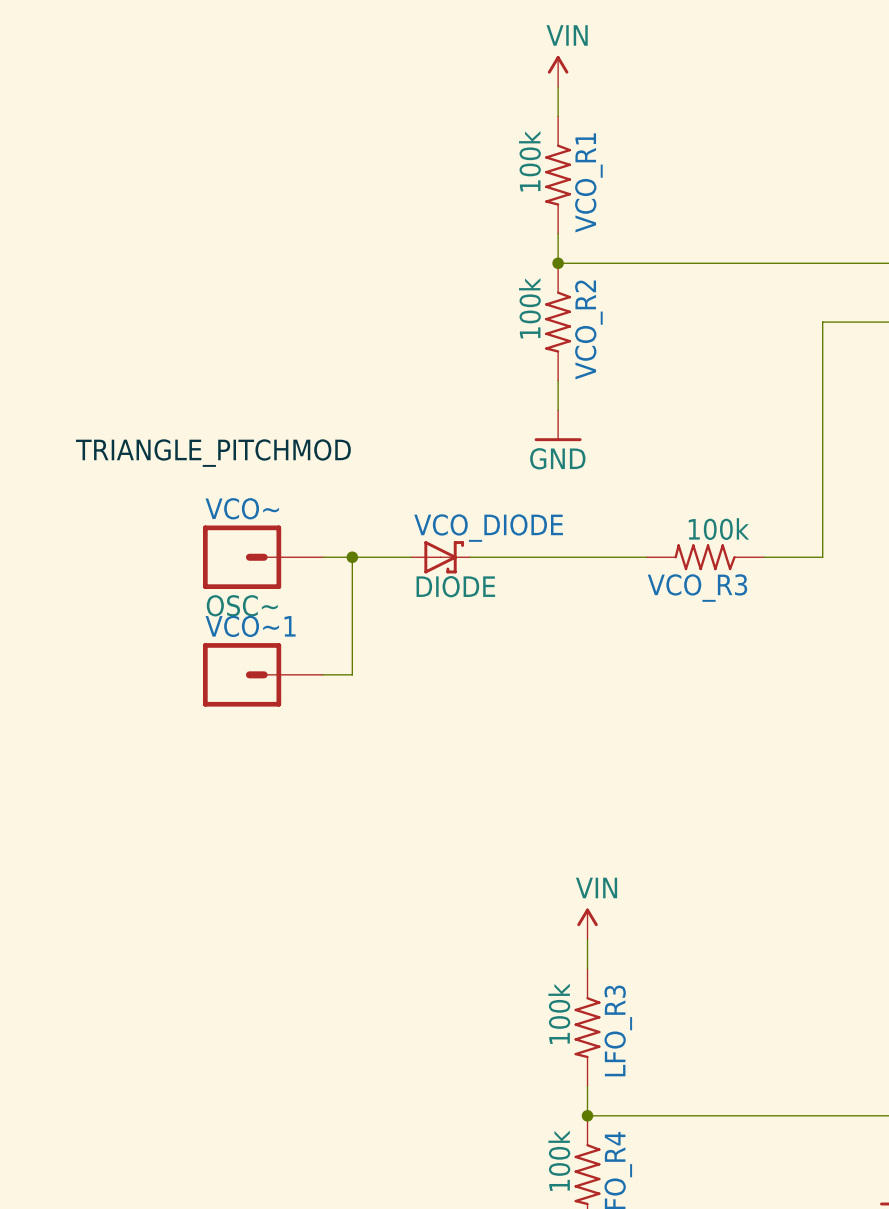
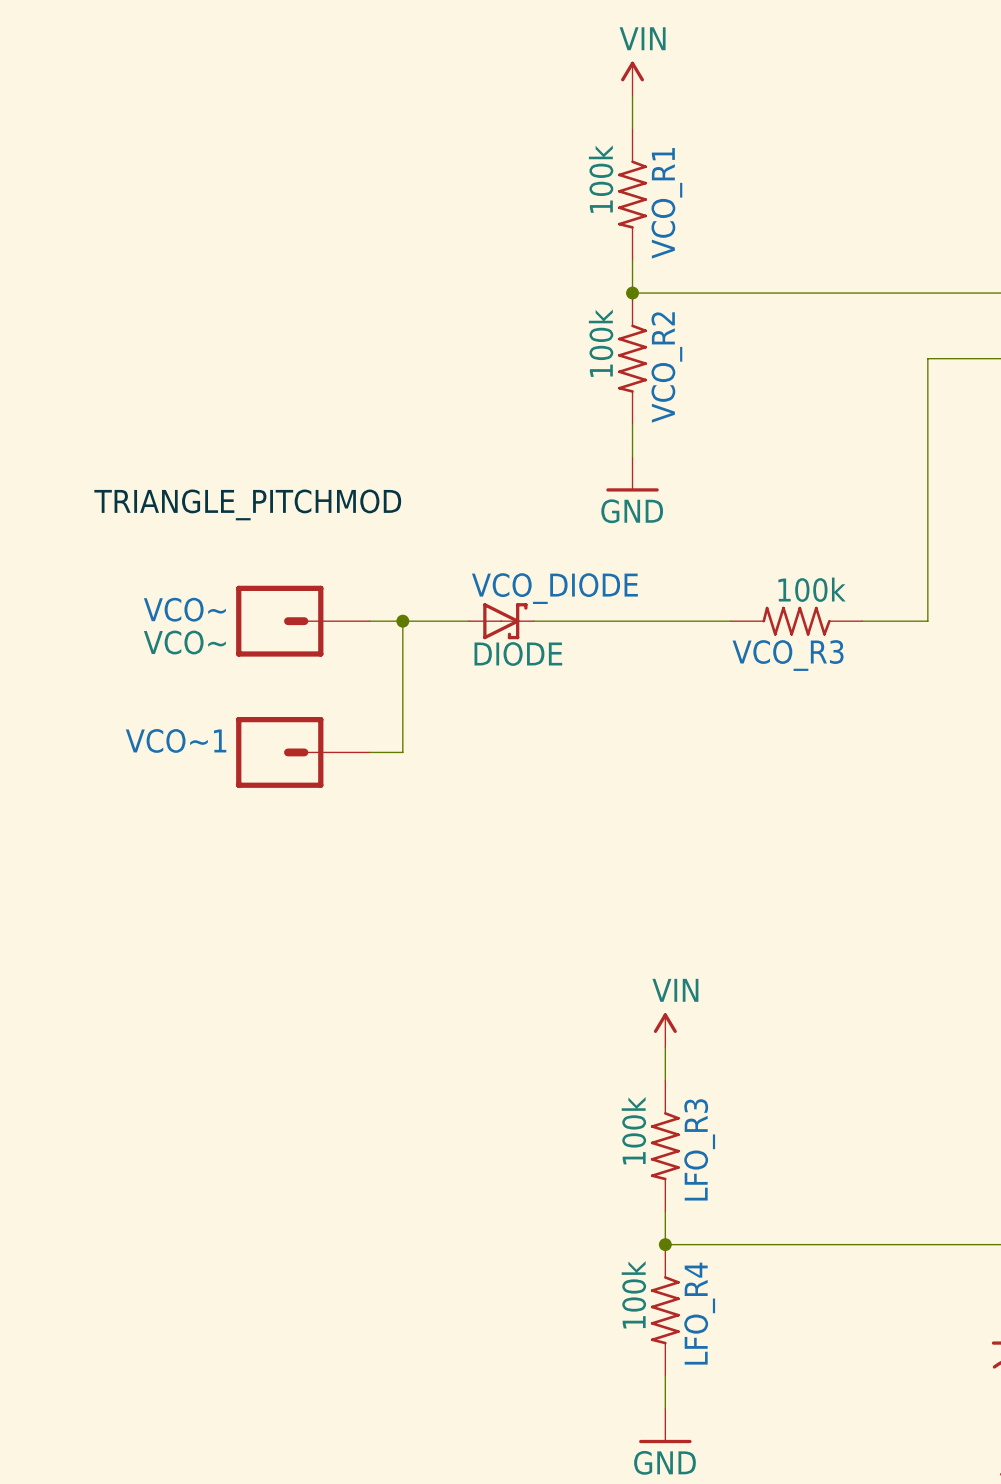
VCO~ name position: VCO~ (242, 508) -> VCO~ (184, 609)
VCO~ value: OSC~ (242, 605) -> VCO~ (184, 642)
VCO~1 name position: VCO~1 (250, 626) -> VCO~1 (176, 740)

